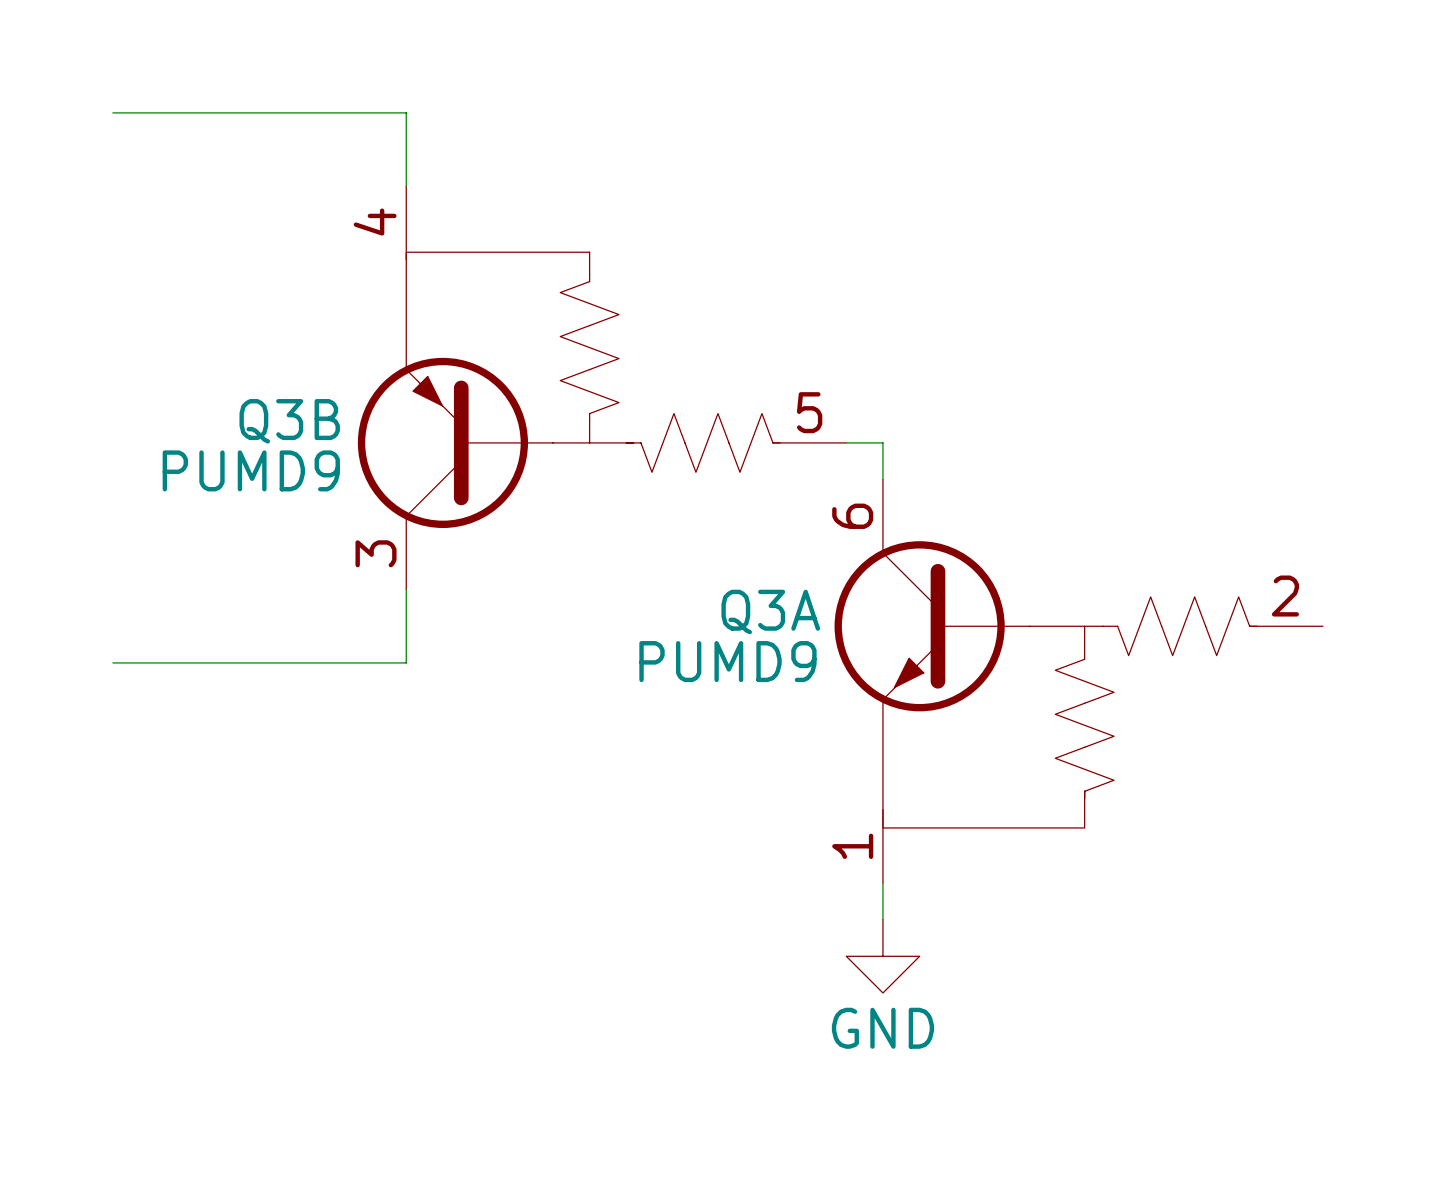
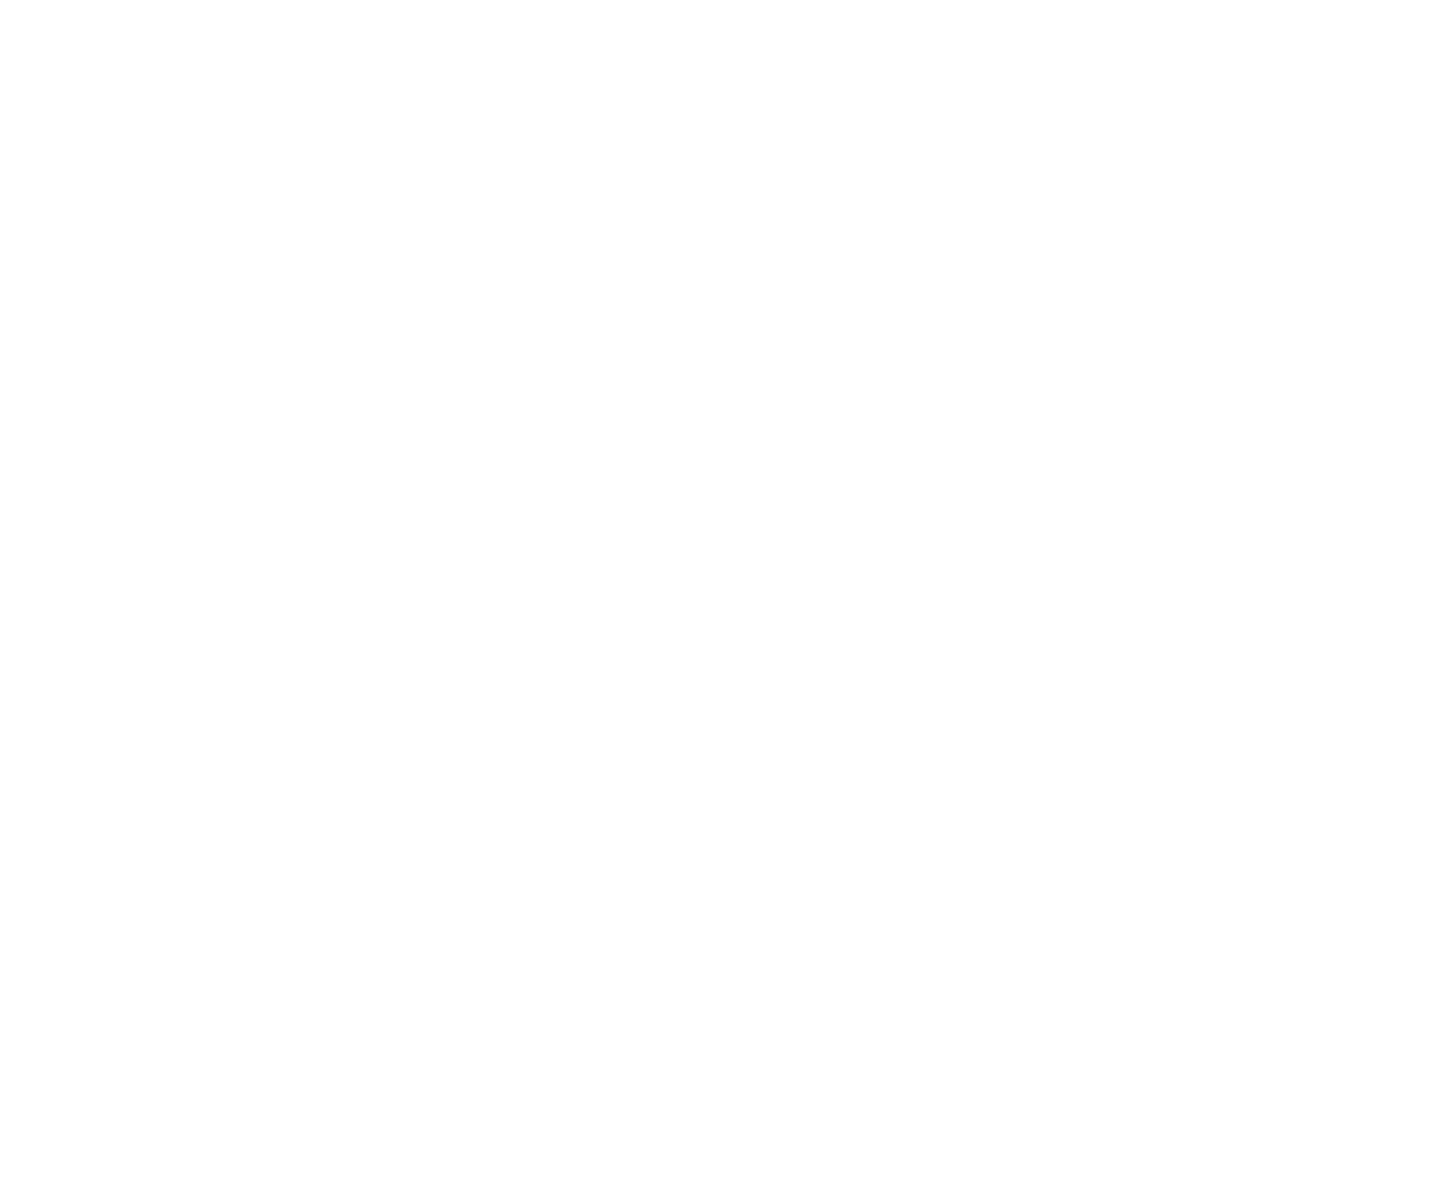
wire: (112, 112) (406, 112) (406, 186) -> none
Q3B: PUMD9 (602, 387) -> none
wire: (846, 442) (882, 442) (882, 479) -> none
wire: (406, 589) (406, 662) (112, 662) -> none
Q3A: PUMD9 (1078, 681) -> none
wire: (882, 882) (882, 919) -> none
power symbol: GND (882, 956) -> none

